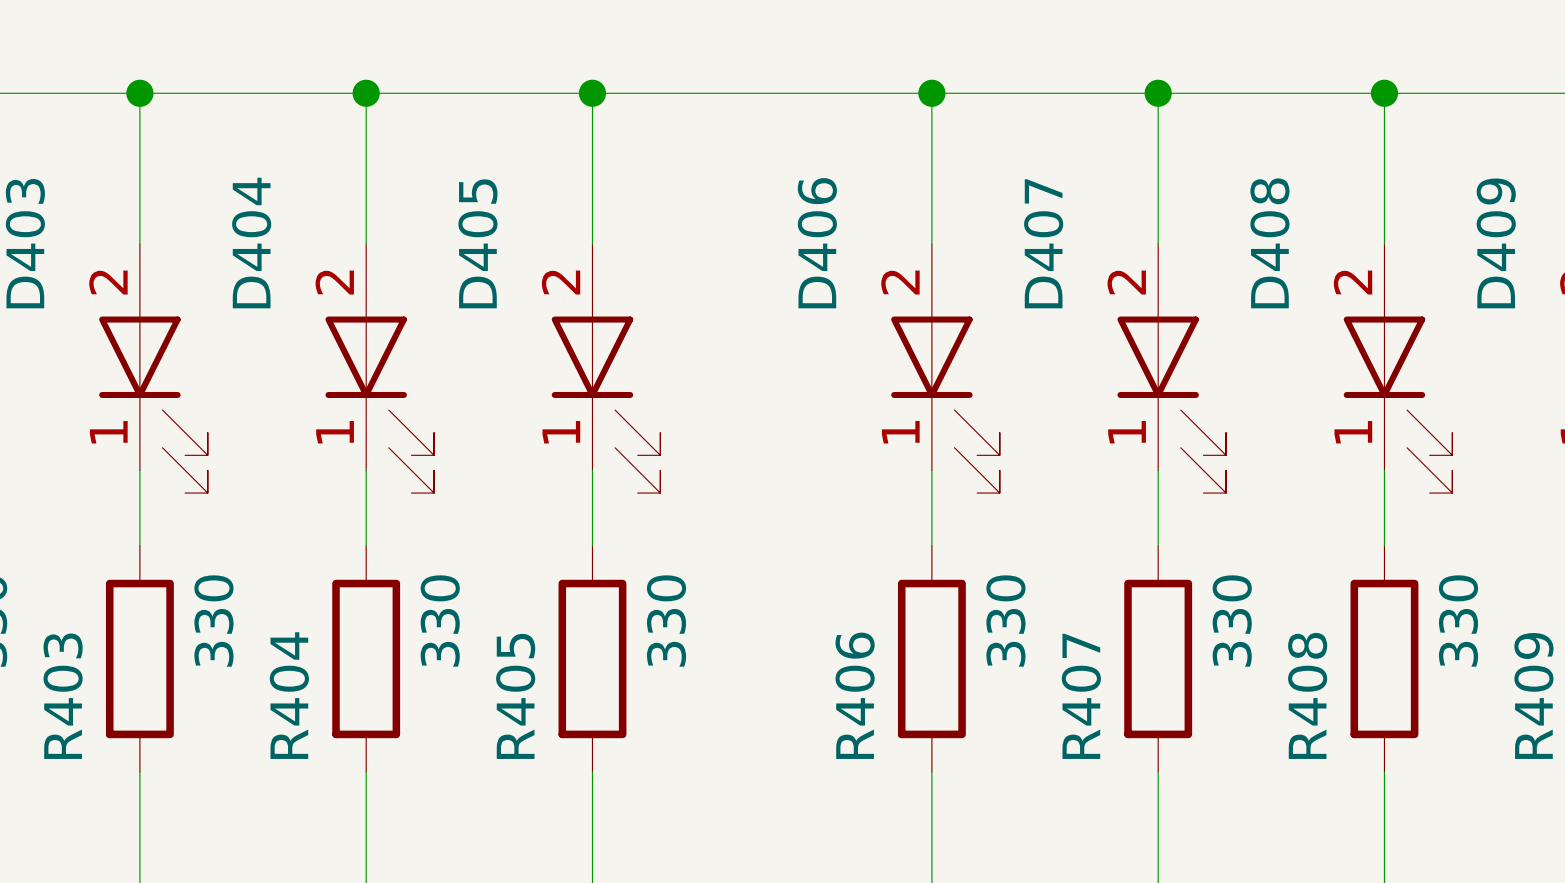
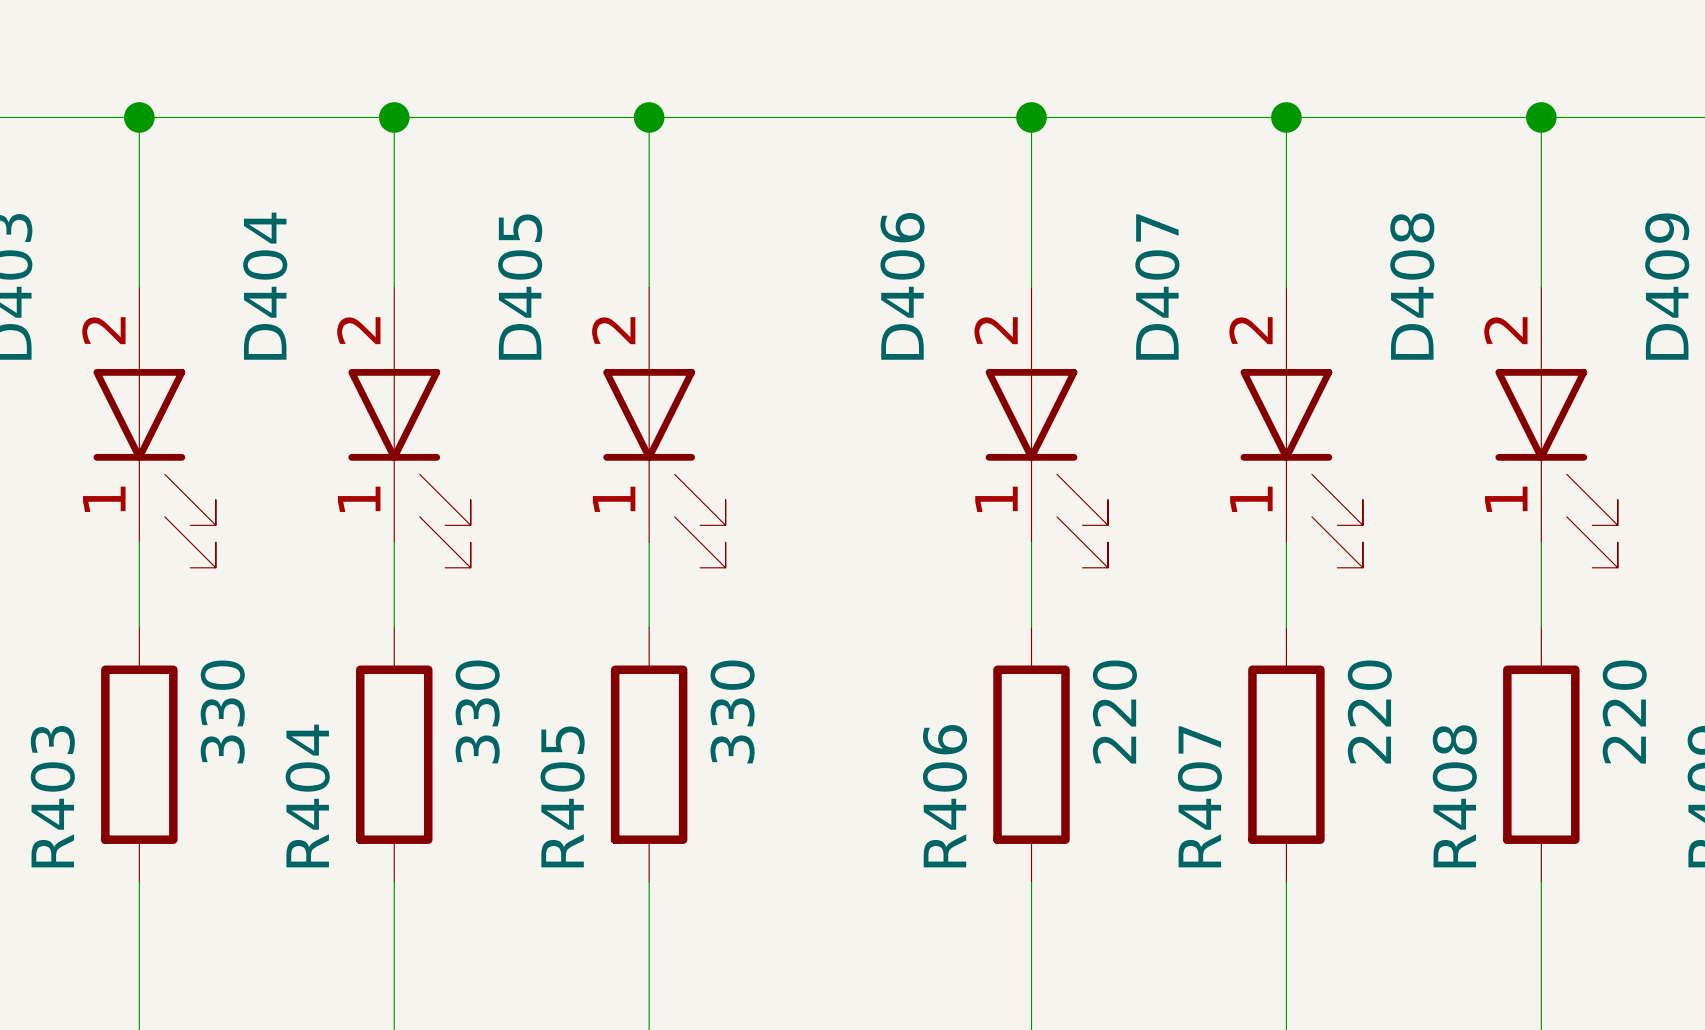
R406 value: 330 (1005, 621) -> 220 (1114, 712)
R407 value: 330 (1232, 621) -> 220 (1369, 712)
R408 value: 330 (1458, 621) -> 220 (1624, 712)

